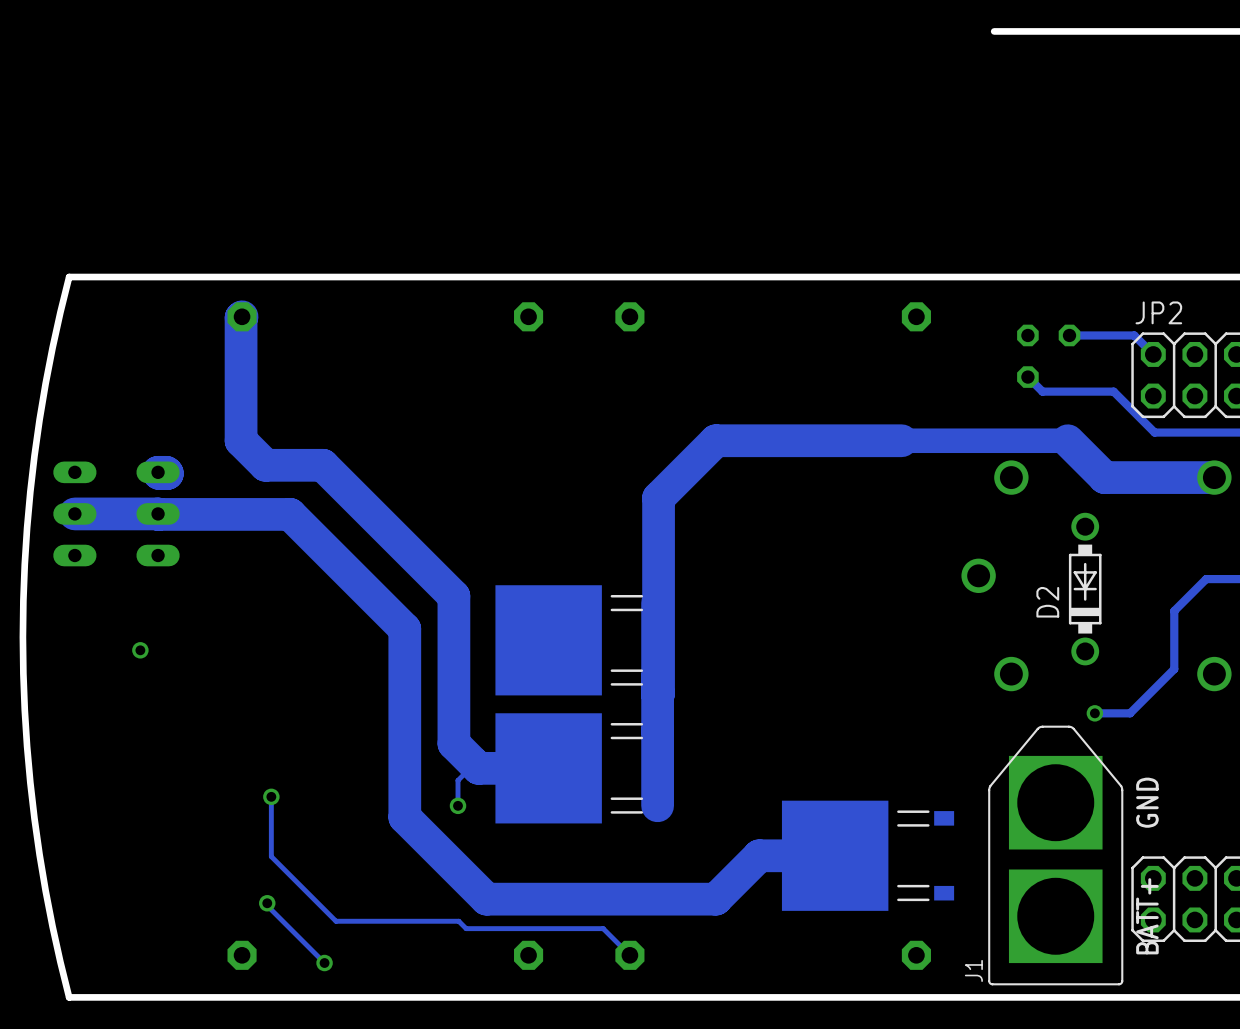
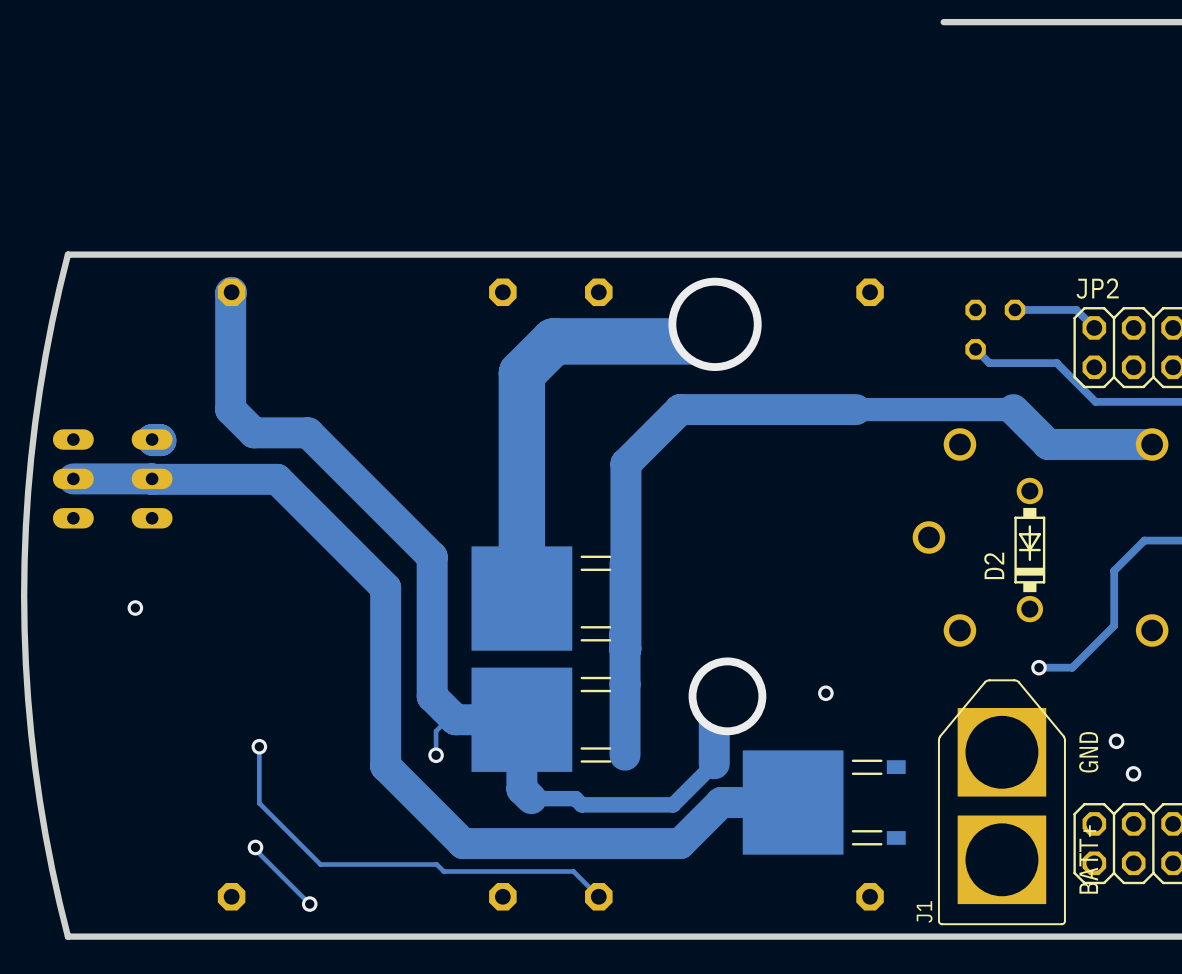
track: none -> (715, 324) (698, 341) (553, 341) (521, 373) (521, 598)
via: none -> (715, 324)
via: none -> (825, 693)
track: none -> (727, 696) (714, 708) (714, 763) (673, 804) (581, 804) (575, 798) (531, 798) (521, 789) (521, 719)
via: none -> (727, 696)
via: none -> (1116, 741)
via: none -> (1133, 773)

